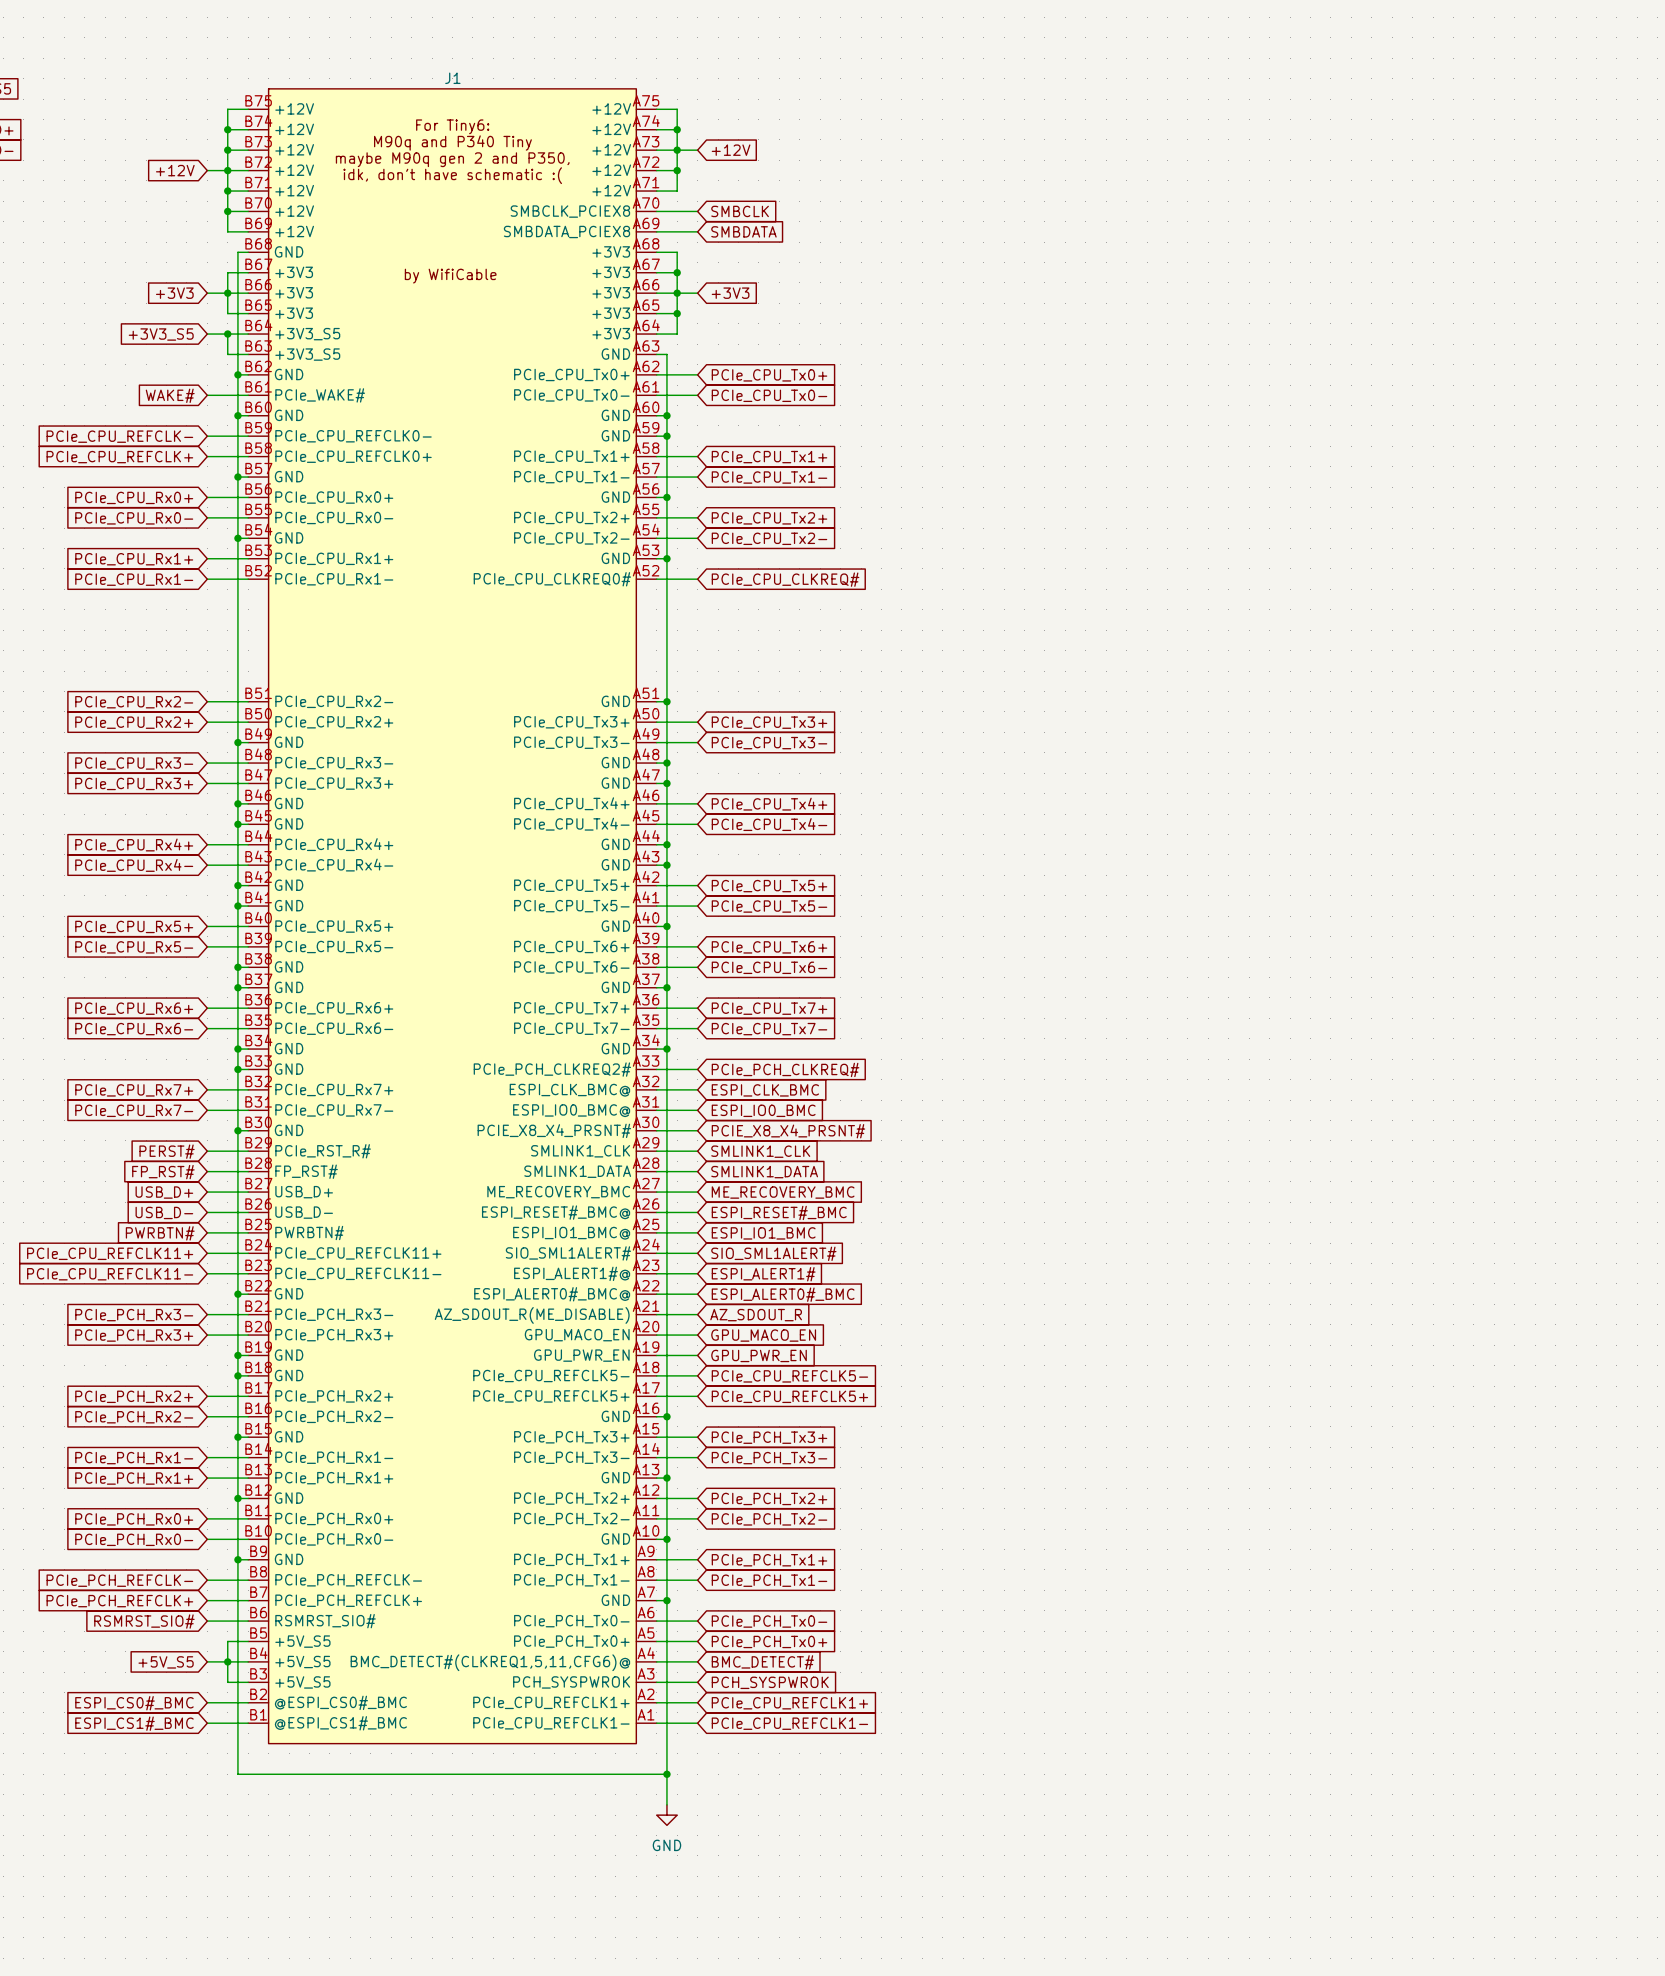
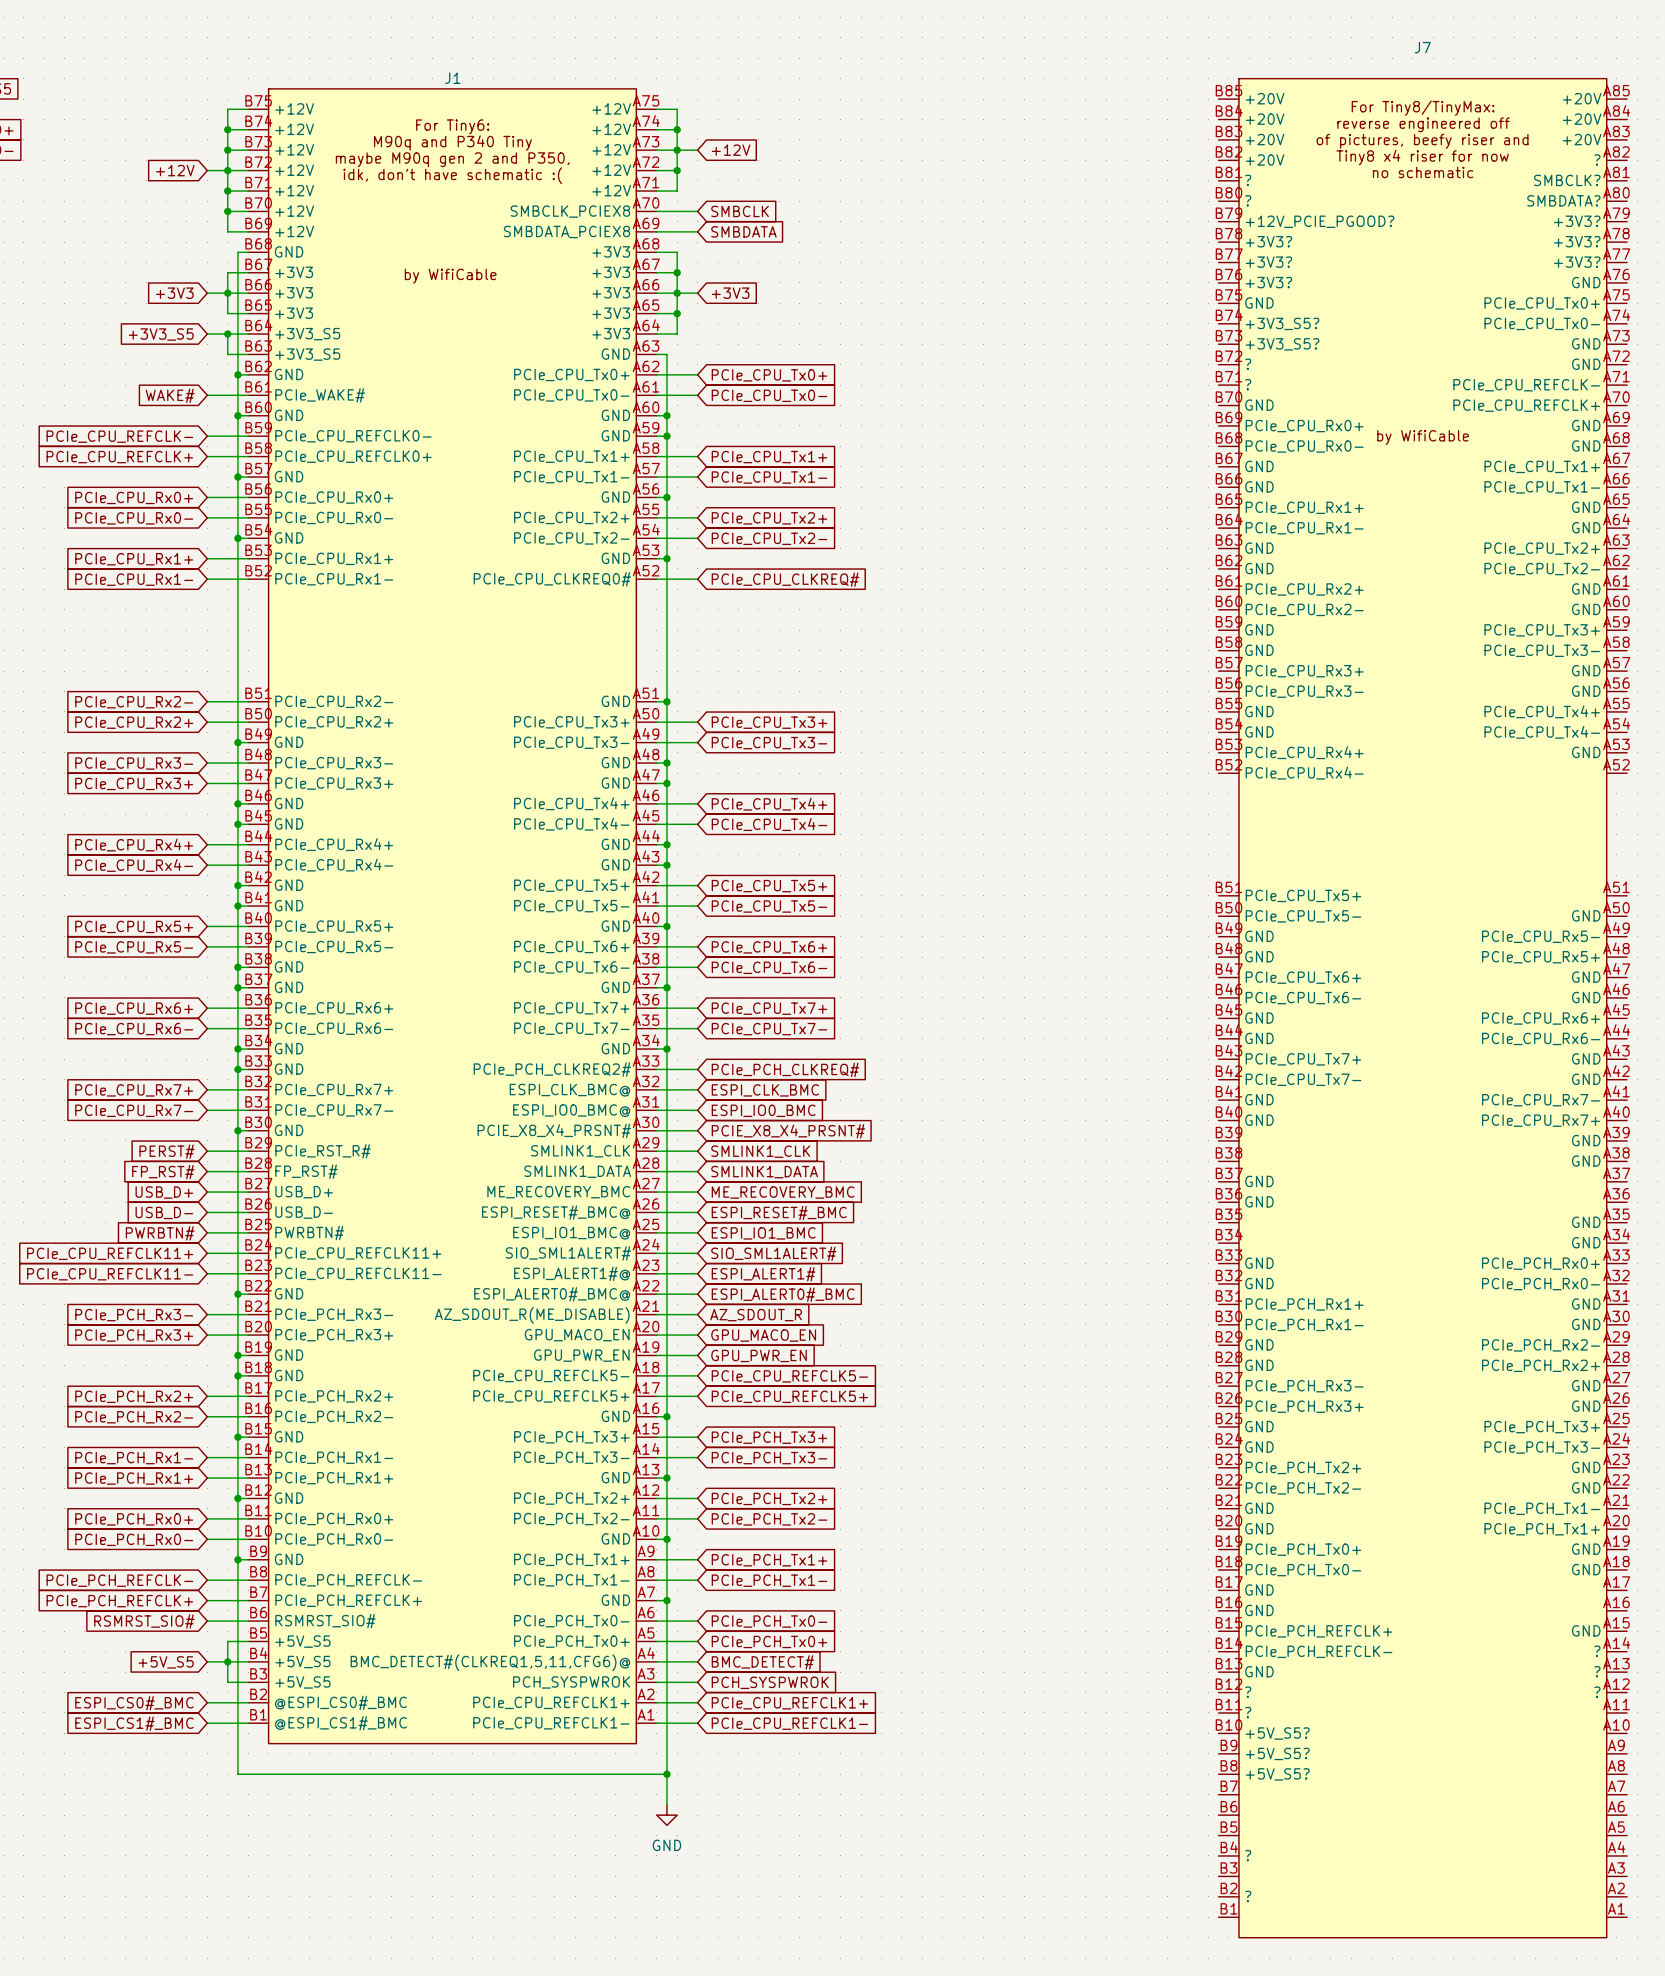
J7: none -> (1422, 1008)

